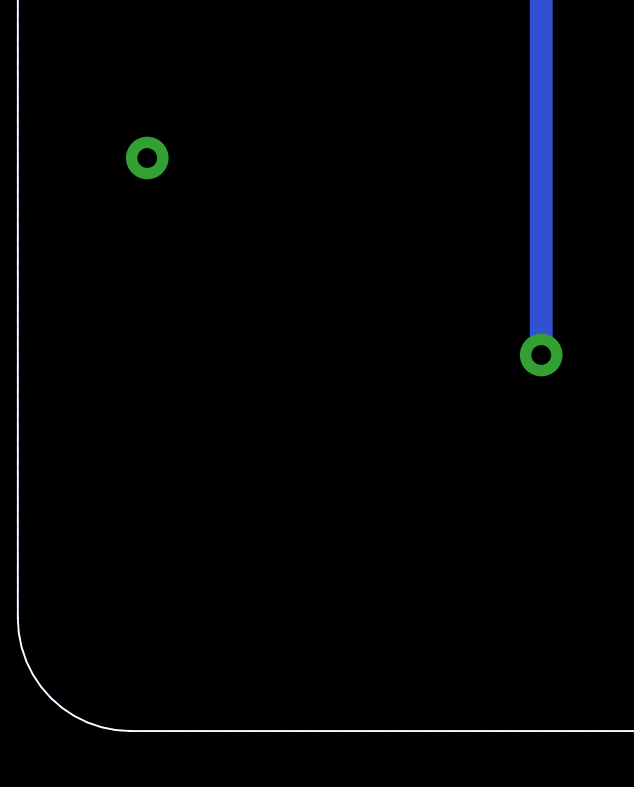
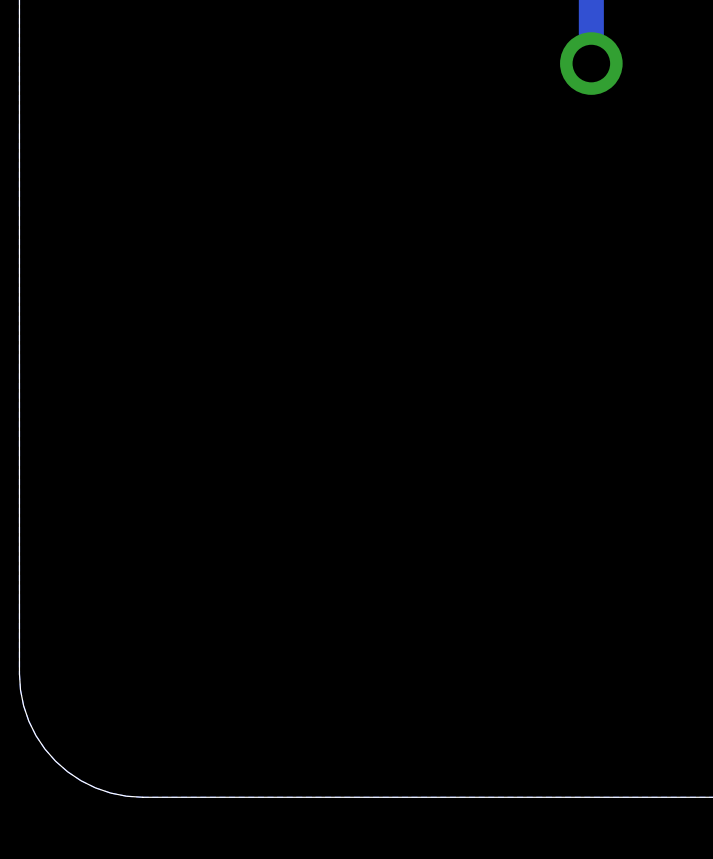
track: (541, 59) (541, 355) -> none
via: none -> (591, 63)
via: (147, 158) -> none
via: (541, 355) -> none

